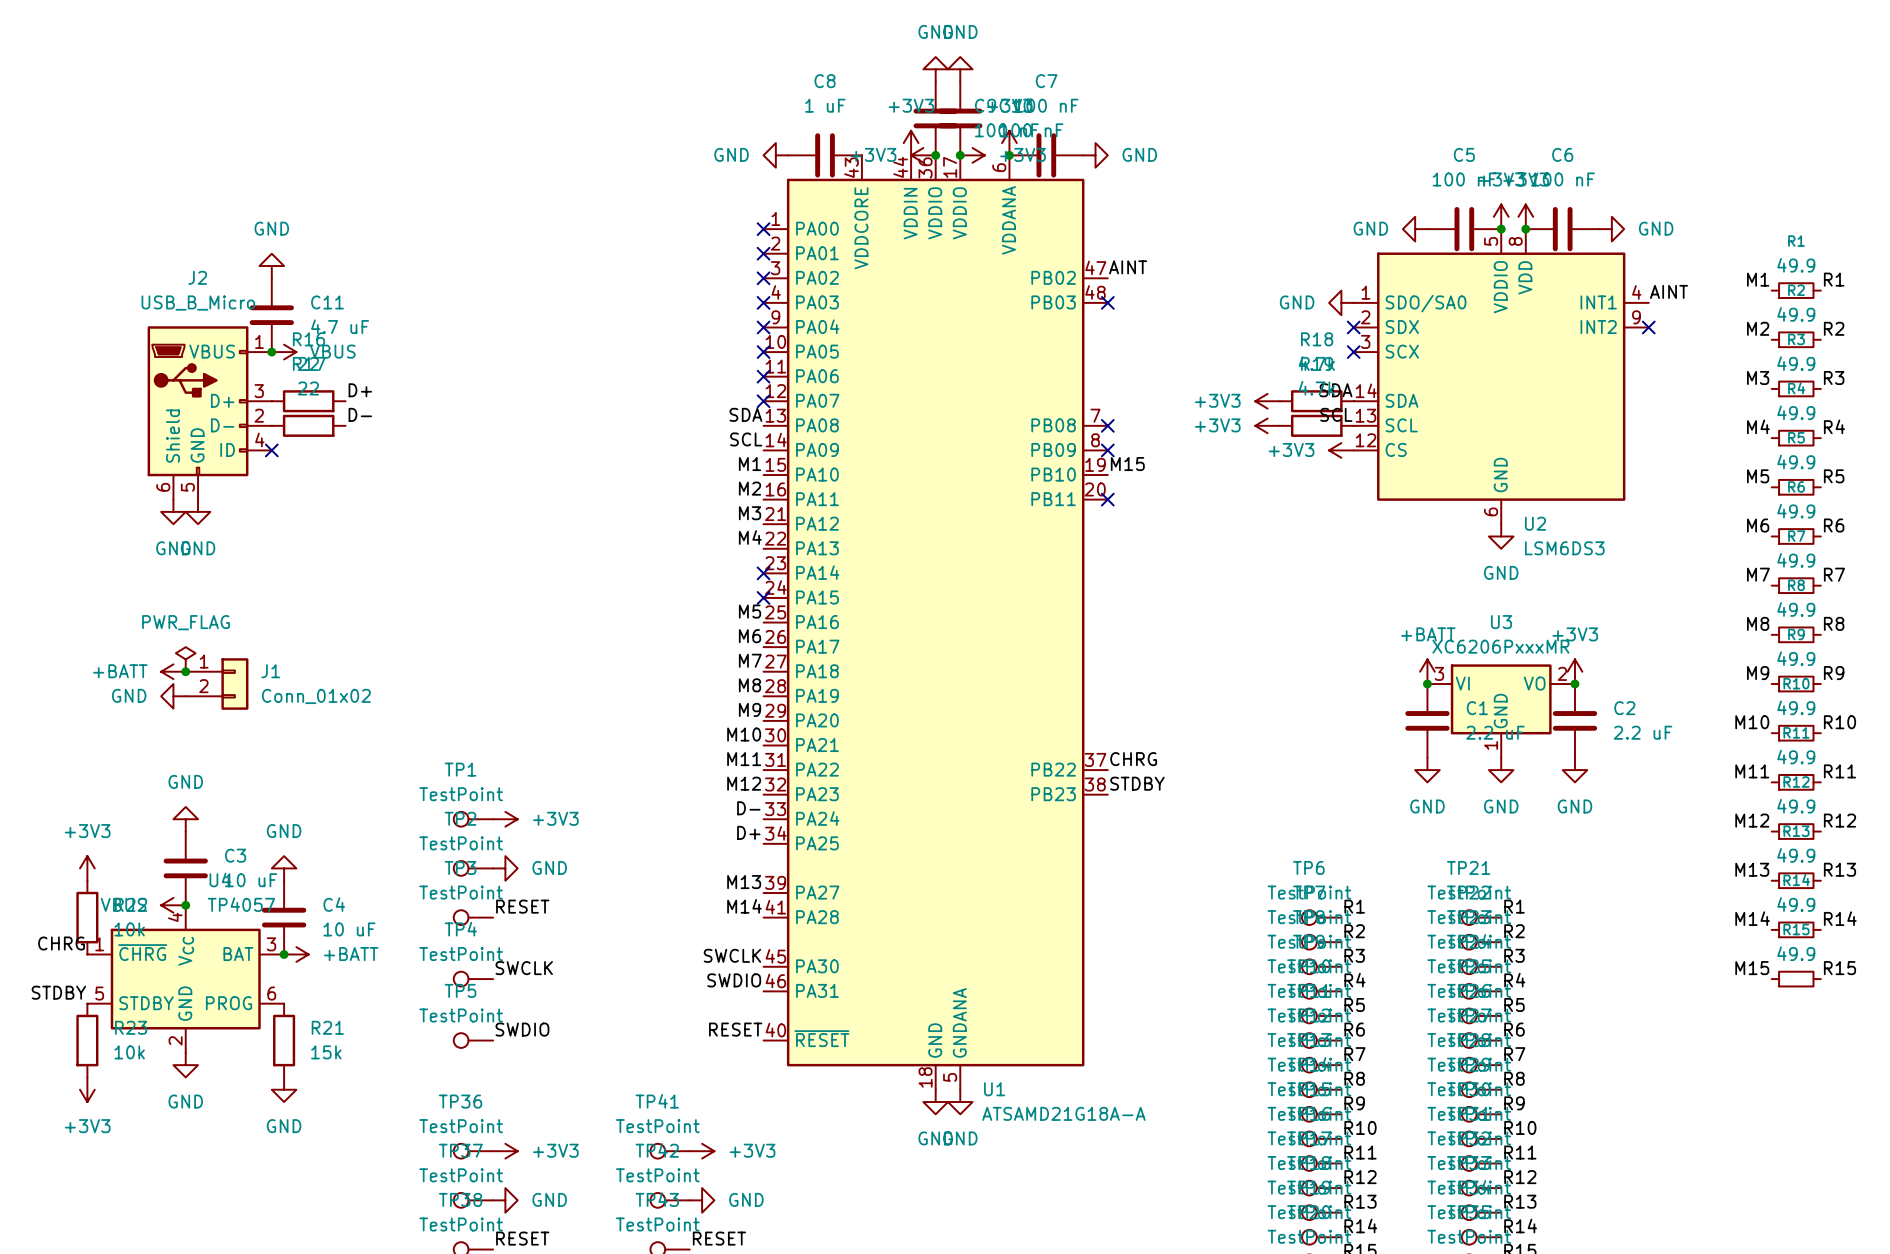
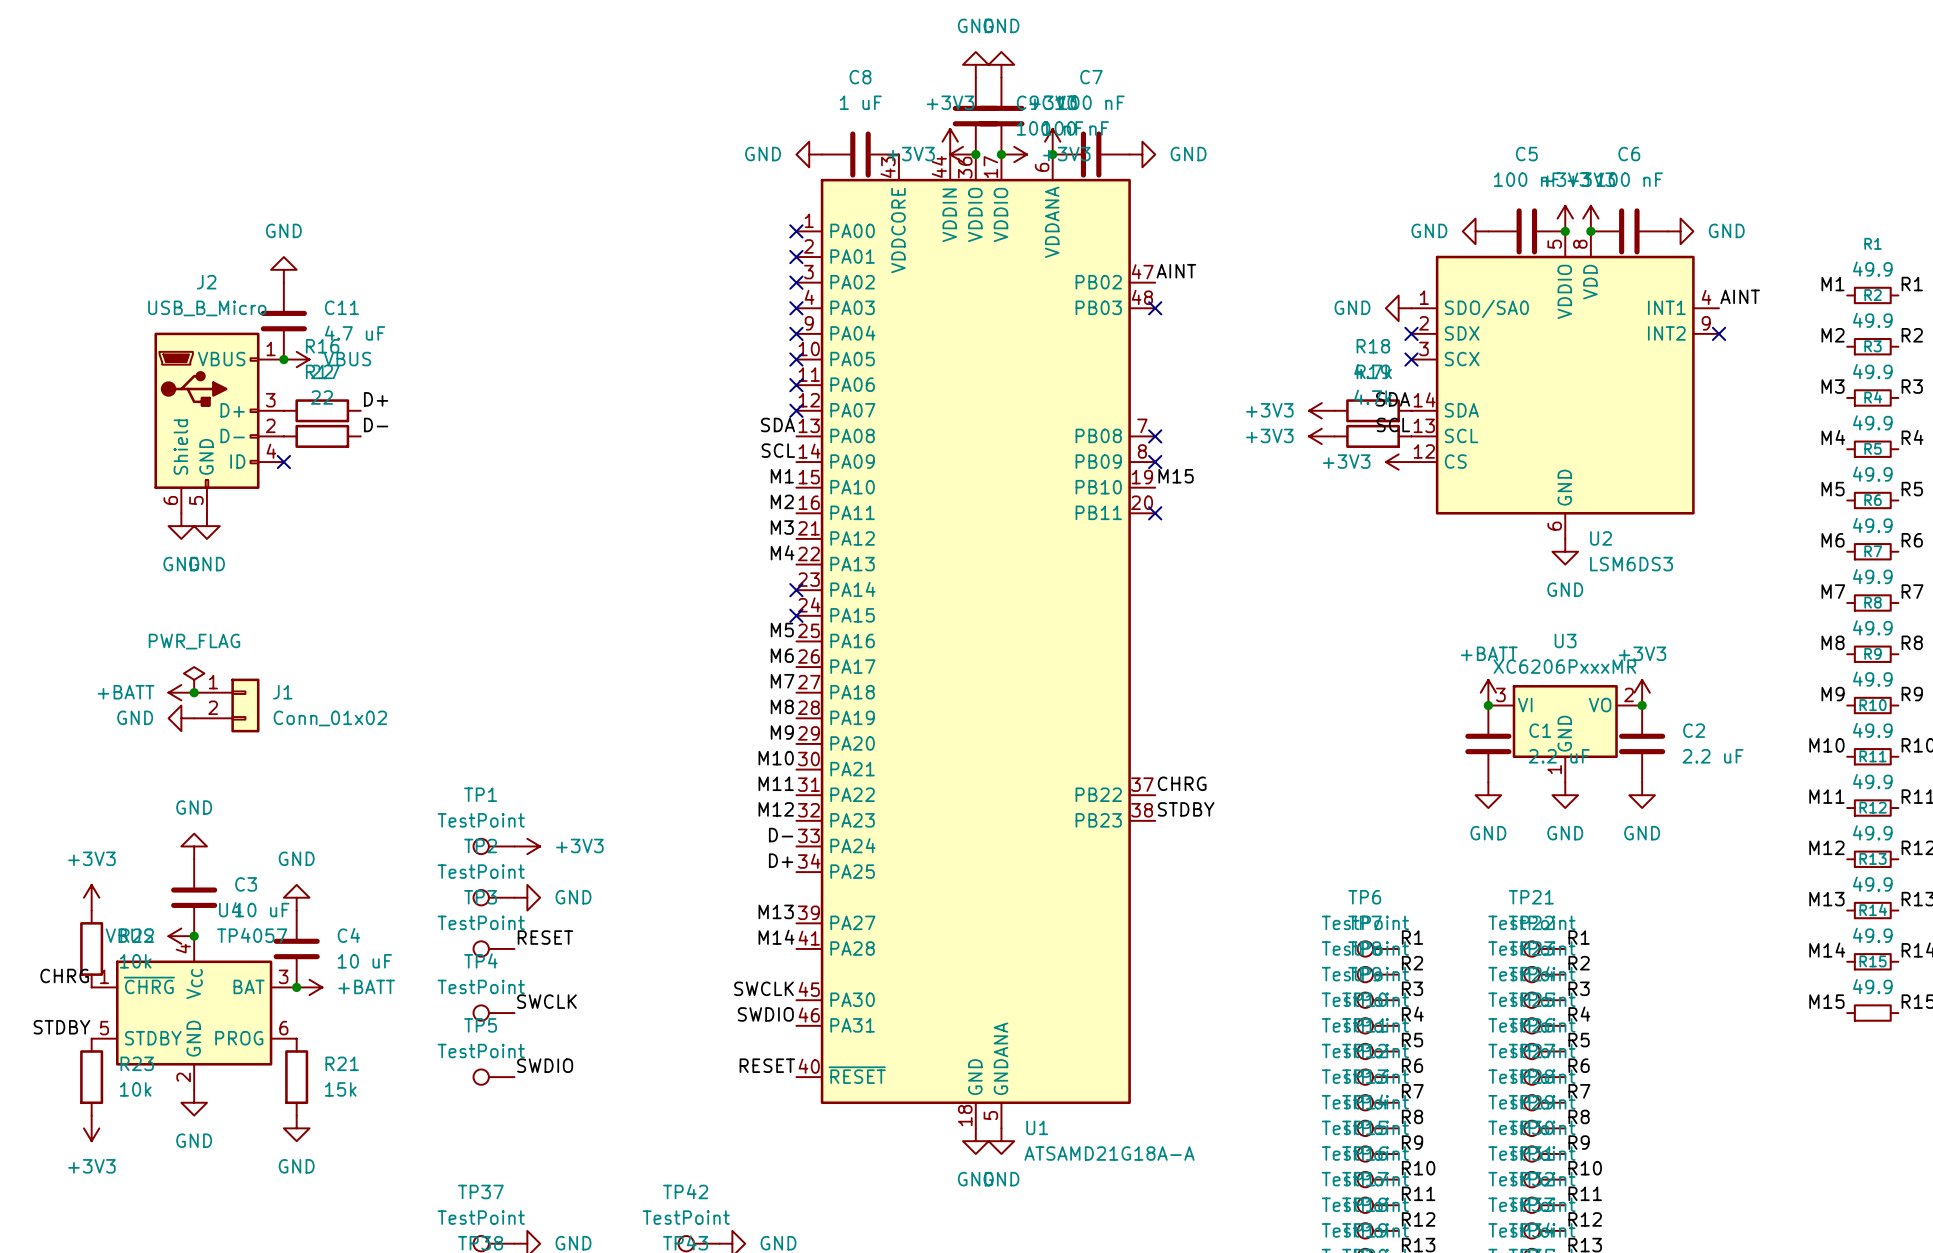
TP36: TestPoint (473, 1151) -> none
power symbol: +3V3 (505, 1151) -> none
TP41: TestPoint (670, 1151) -> none
power symbol: +3V3 (702, 1151) -> none

